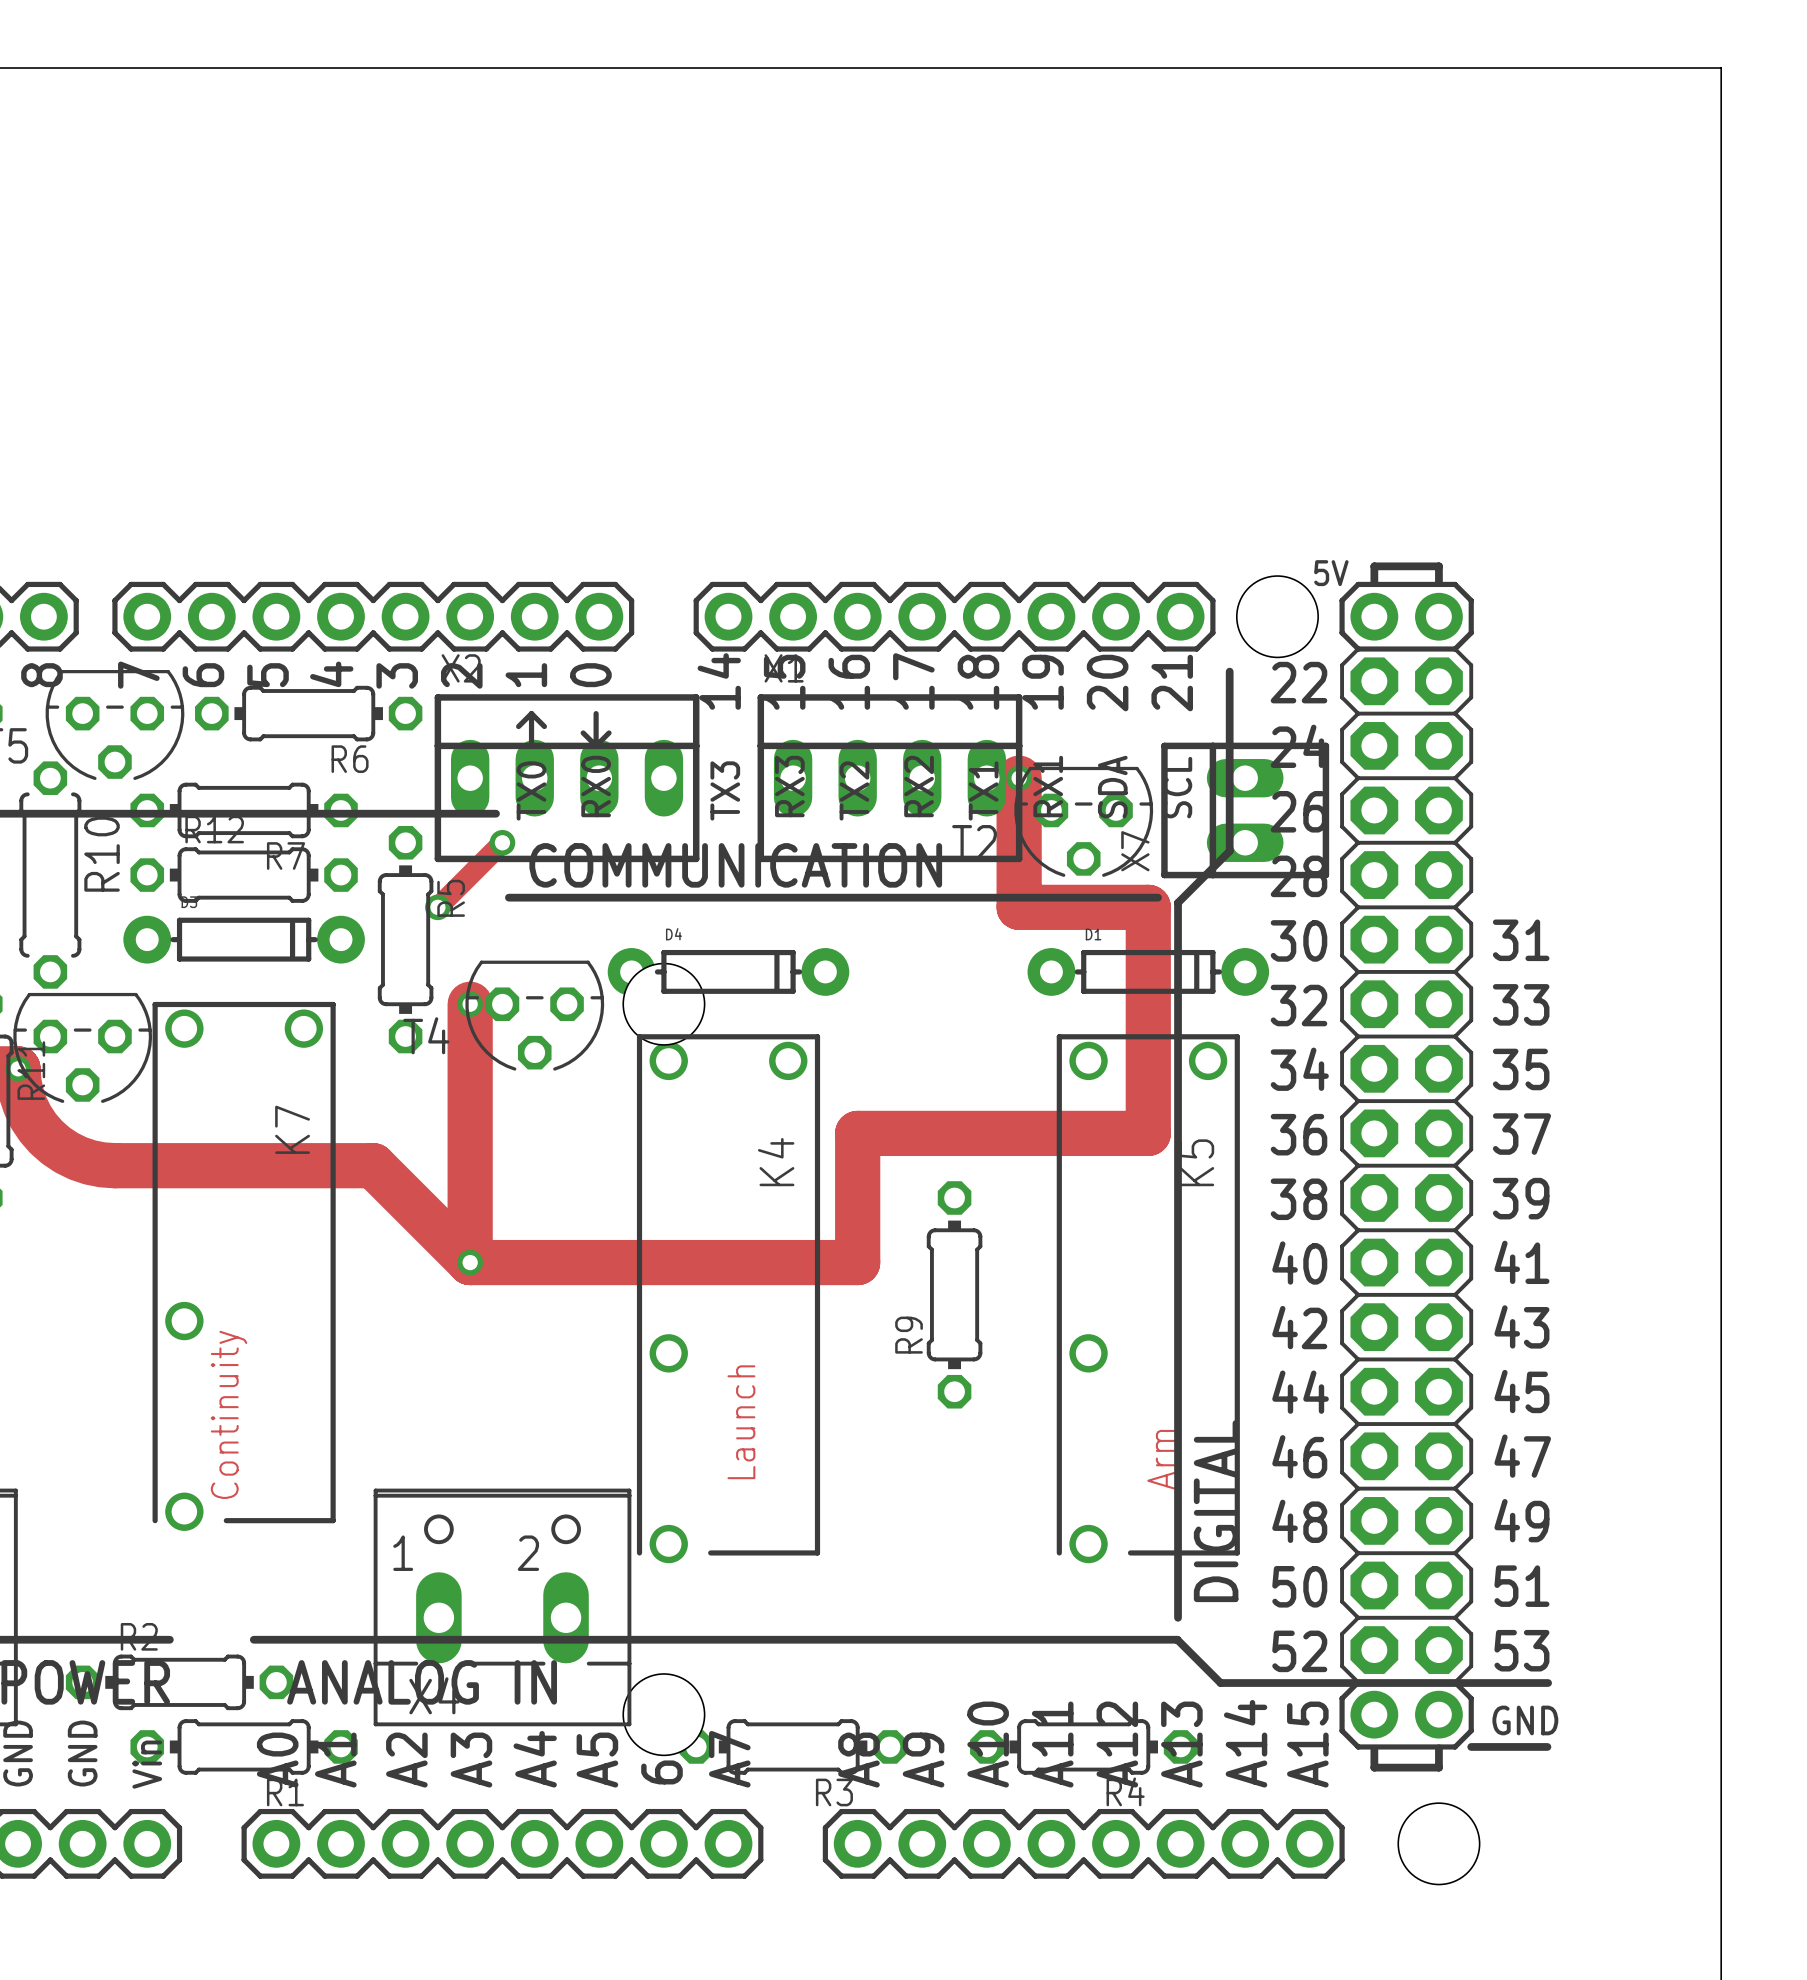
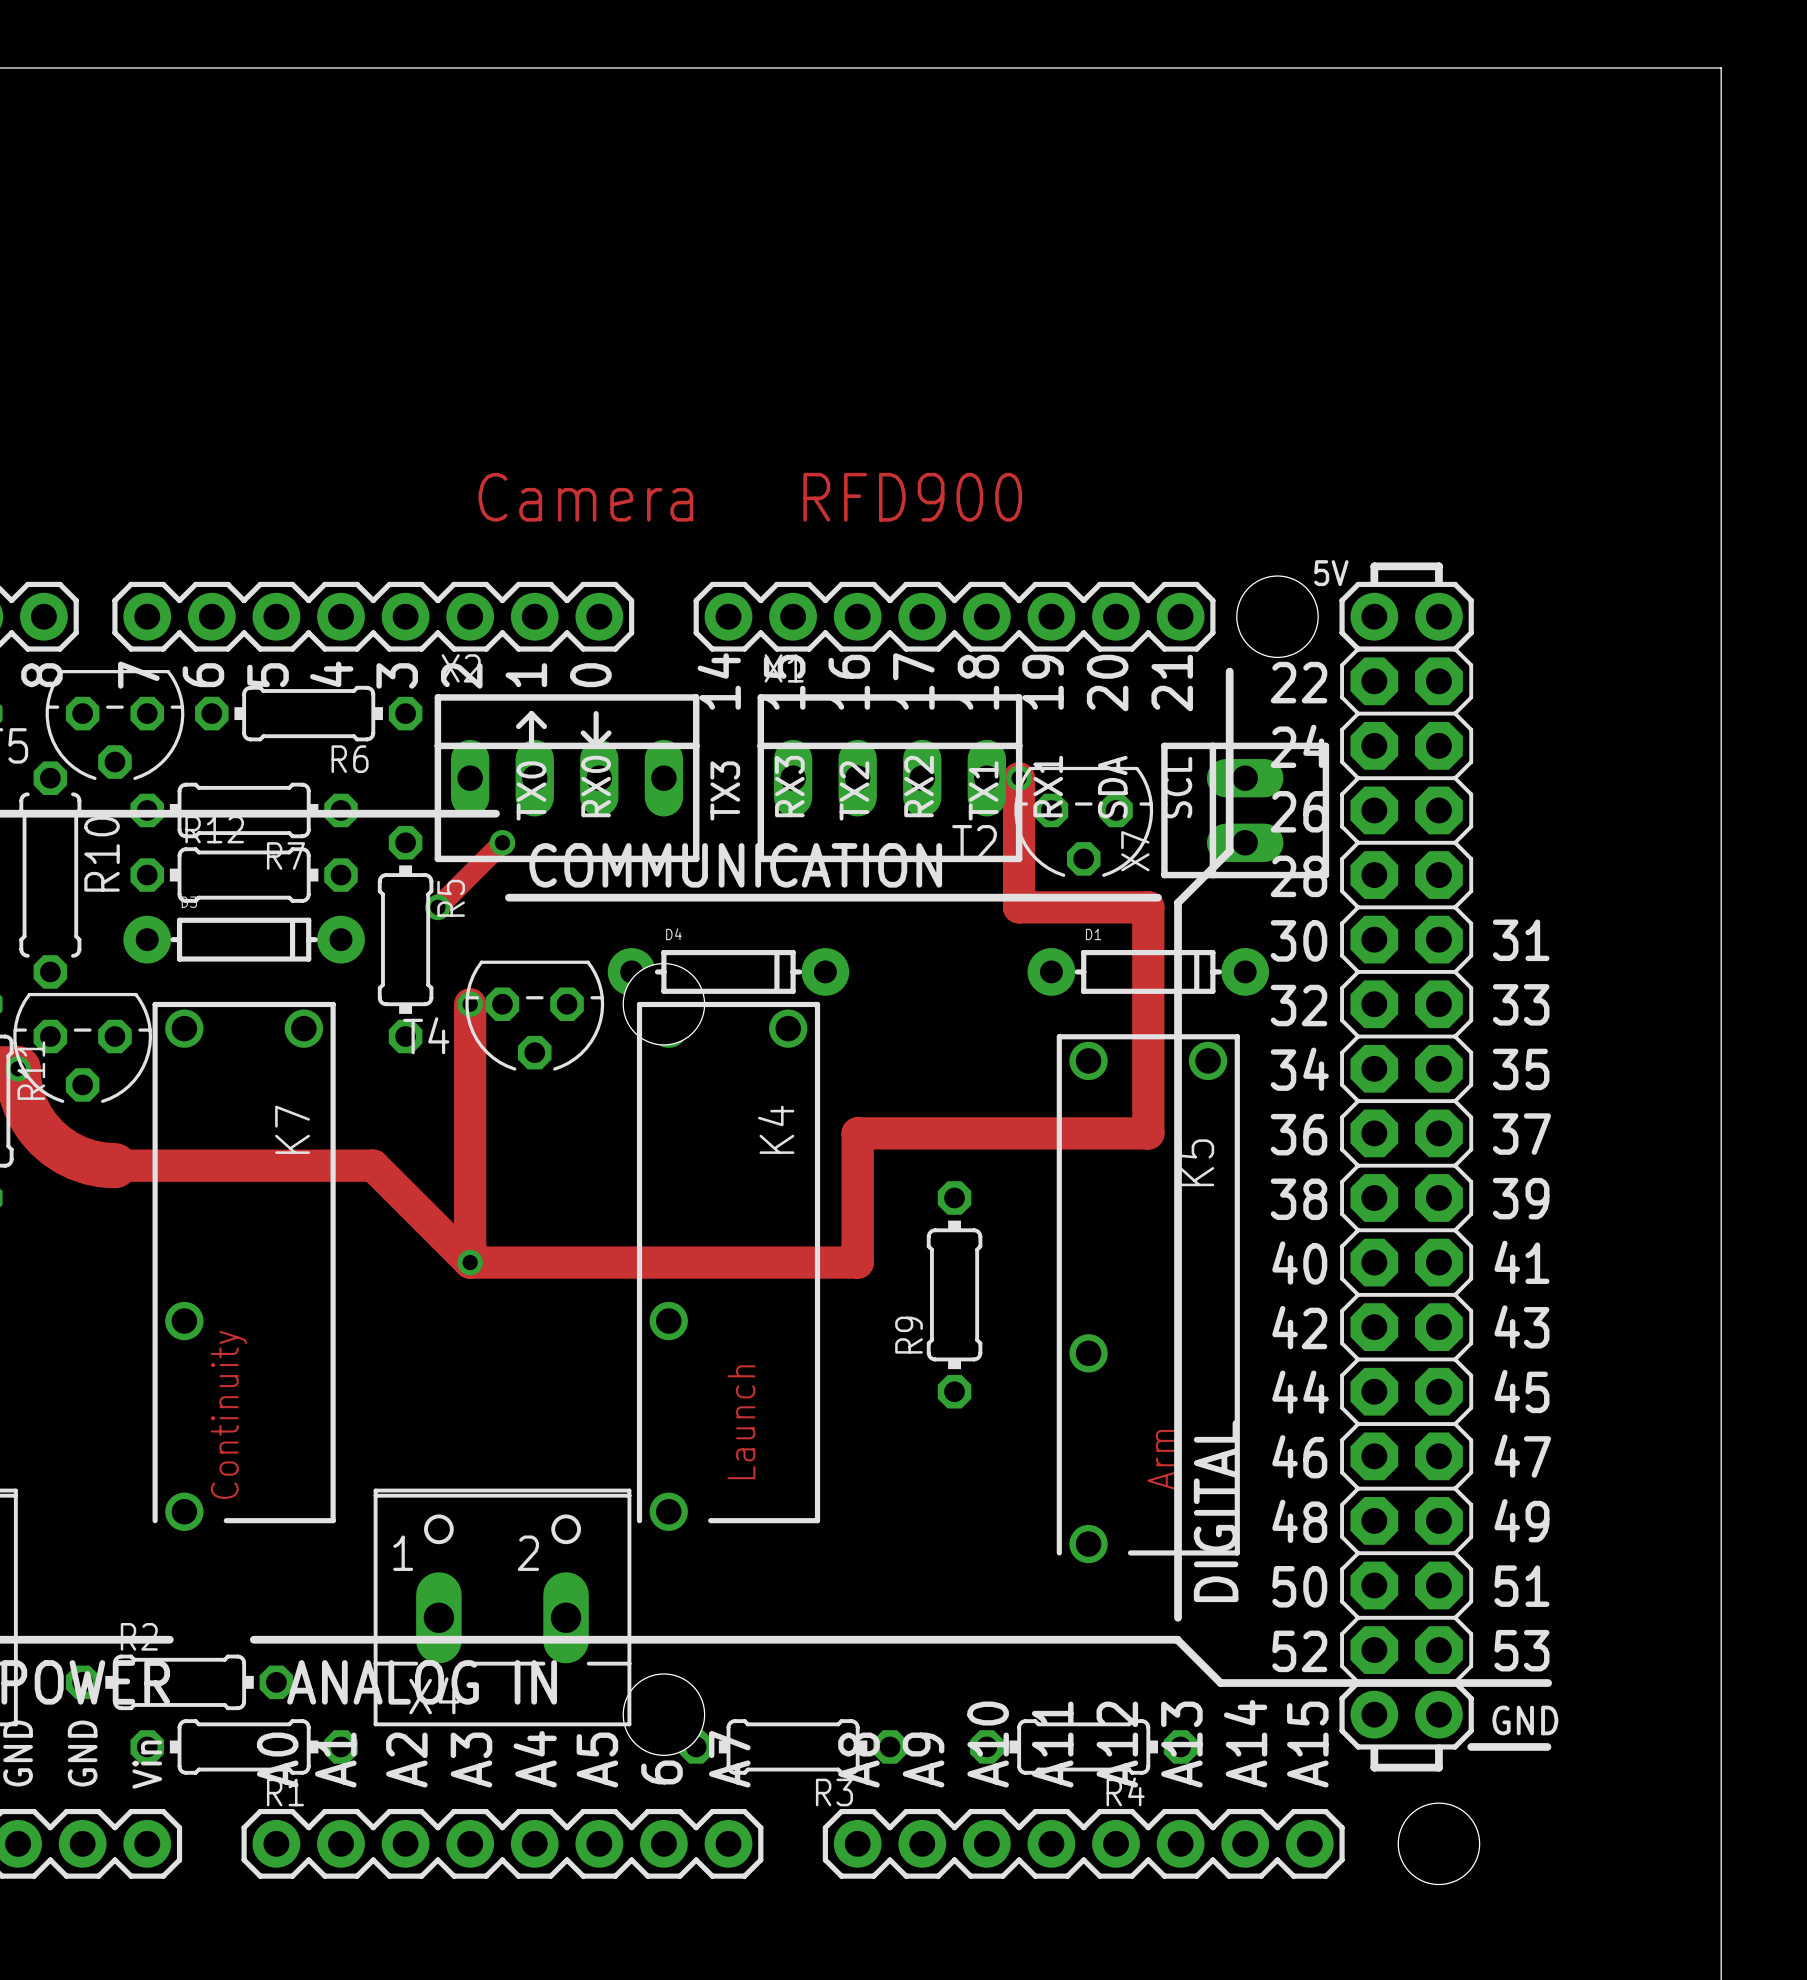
text: none -> Camera (585, 497)
text: none -> RFD900 (912, 497)
track width: thick (1019, 778) (1019, 907) (1148, 907) (1148, 1133) (857, 1133) (857, 1262) (470, 1262) -> thin (1019, 778) (1019, 907) (1148, 907) (1148, 1133) (857, 1133) (857, 1262) (470, 1262)
track width: thick (470, 1004) (470, 1262) -> thin (470, 1004) (470, 1262)
track width: thick (114, 1165) (373, 1165) (470, 1262) -> thin (114, 1165) (373, 1165) (470, 1262)
K4 position: (728, 1298) -> (728, 1266)

